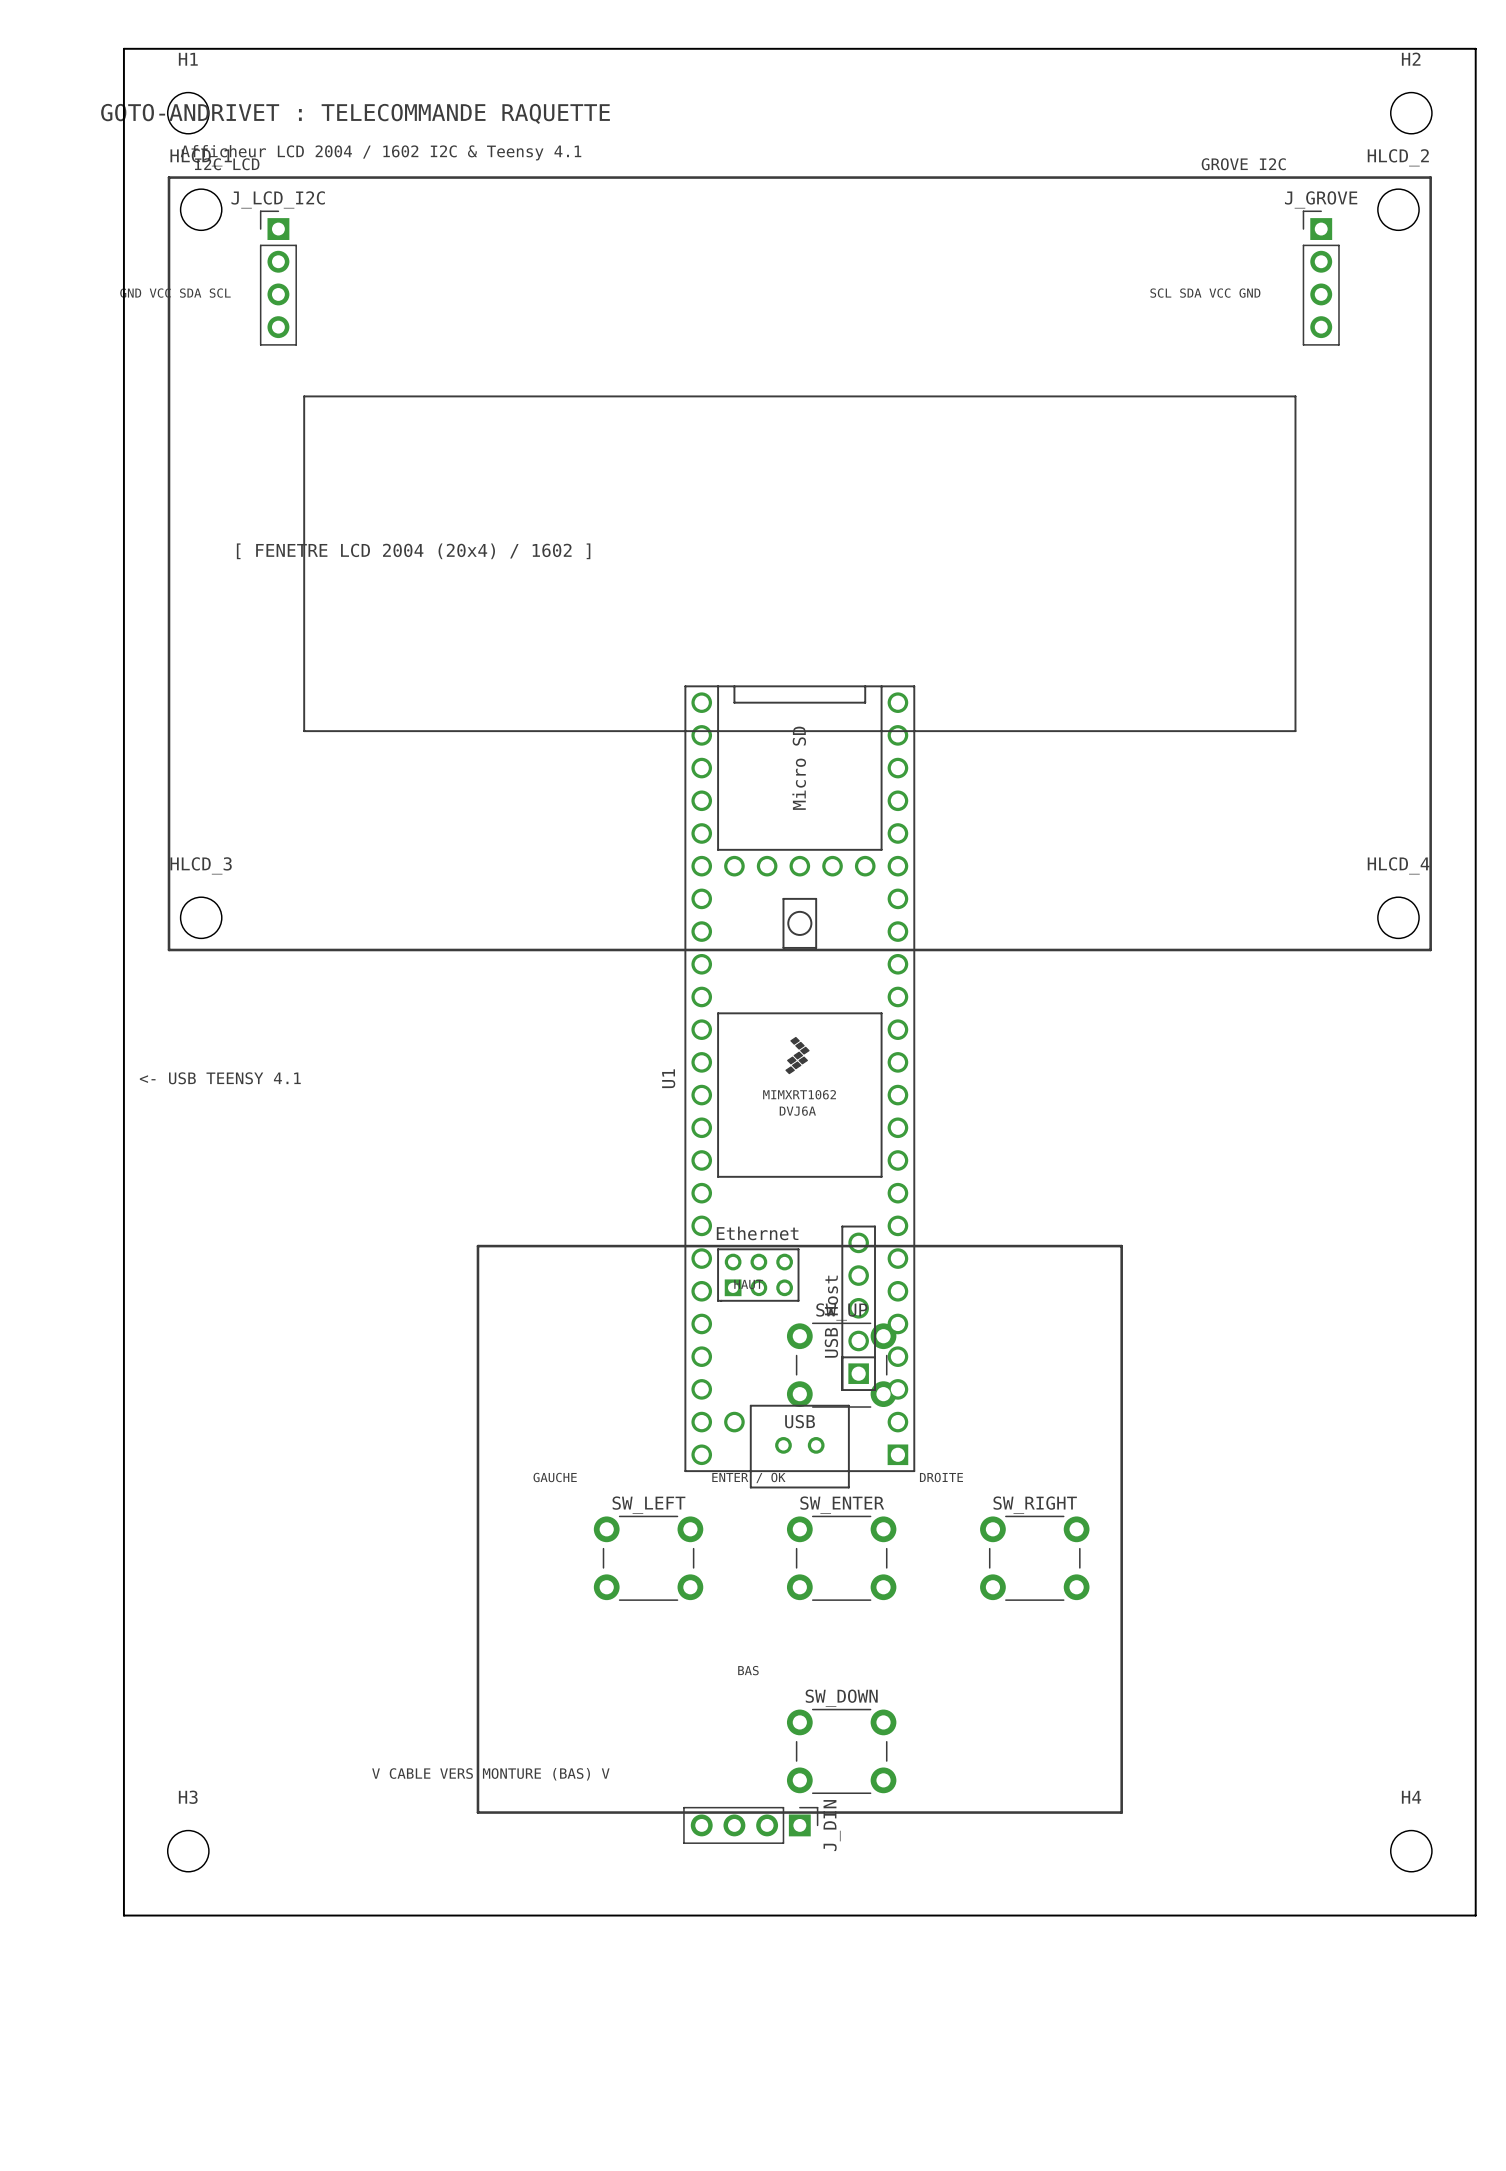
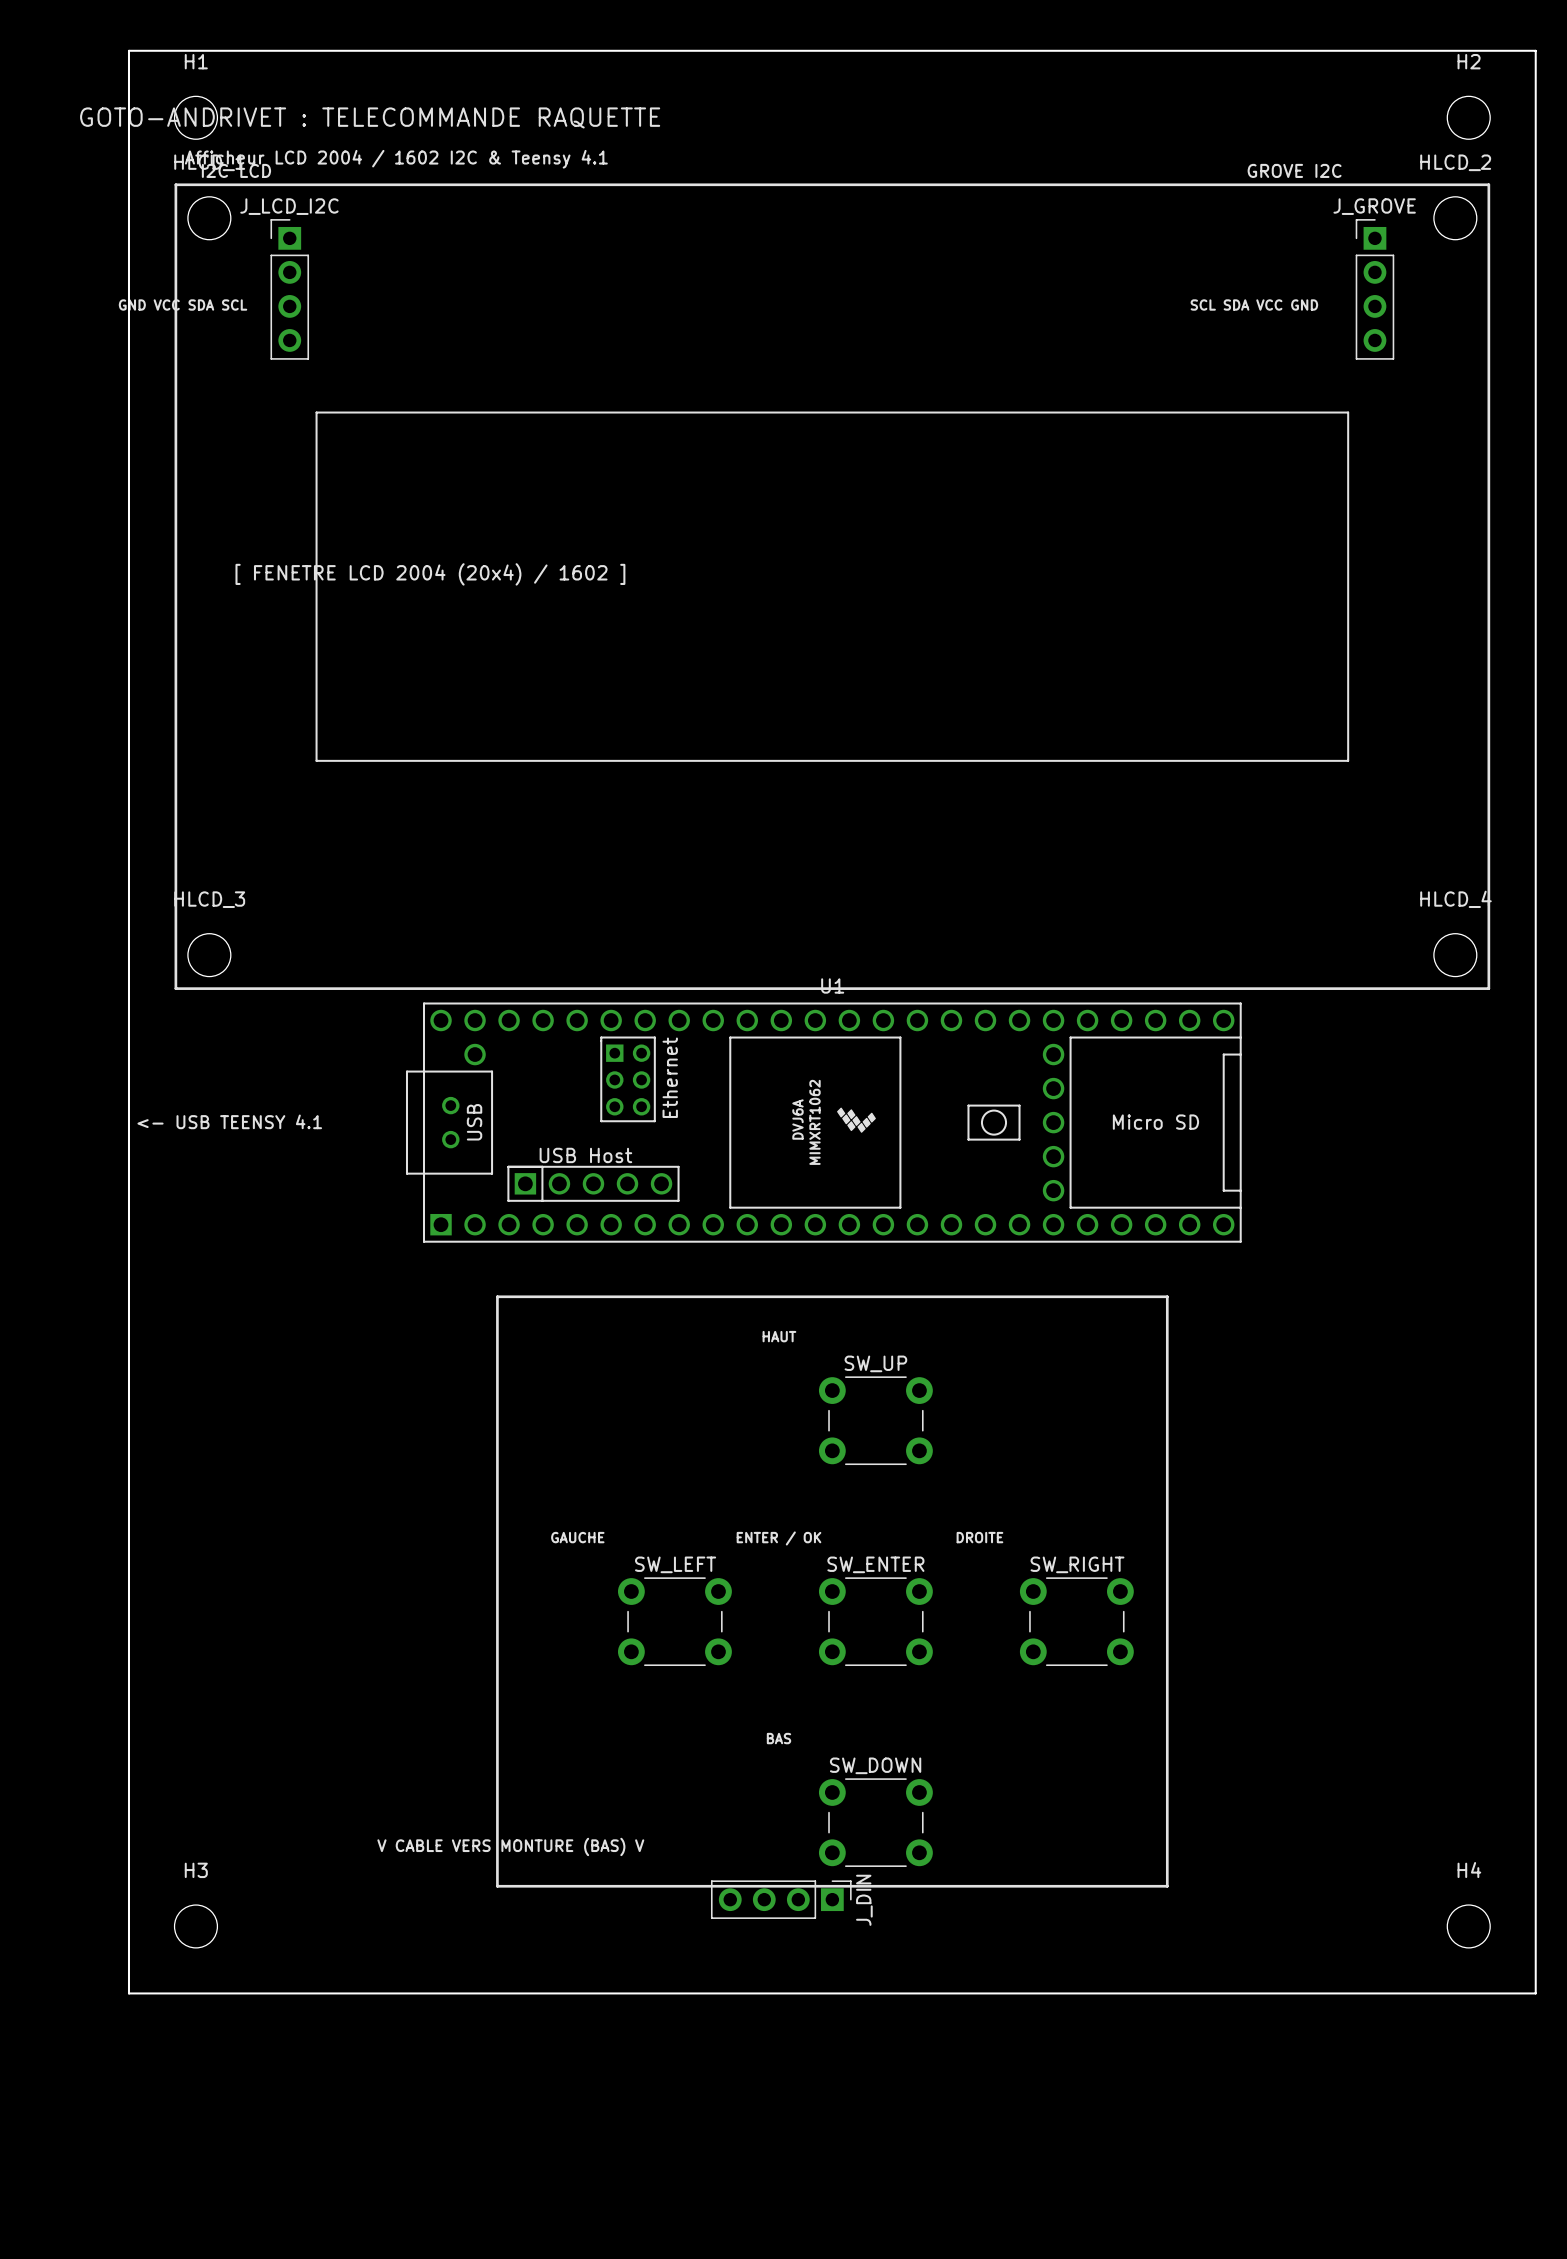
U1 rotation: 0° (799, 1086) -> 90° clockwise (823, 1122)

